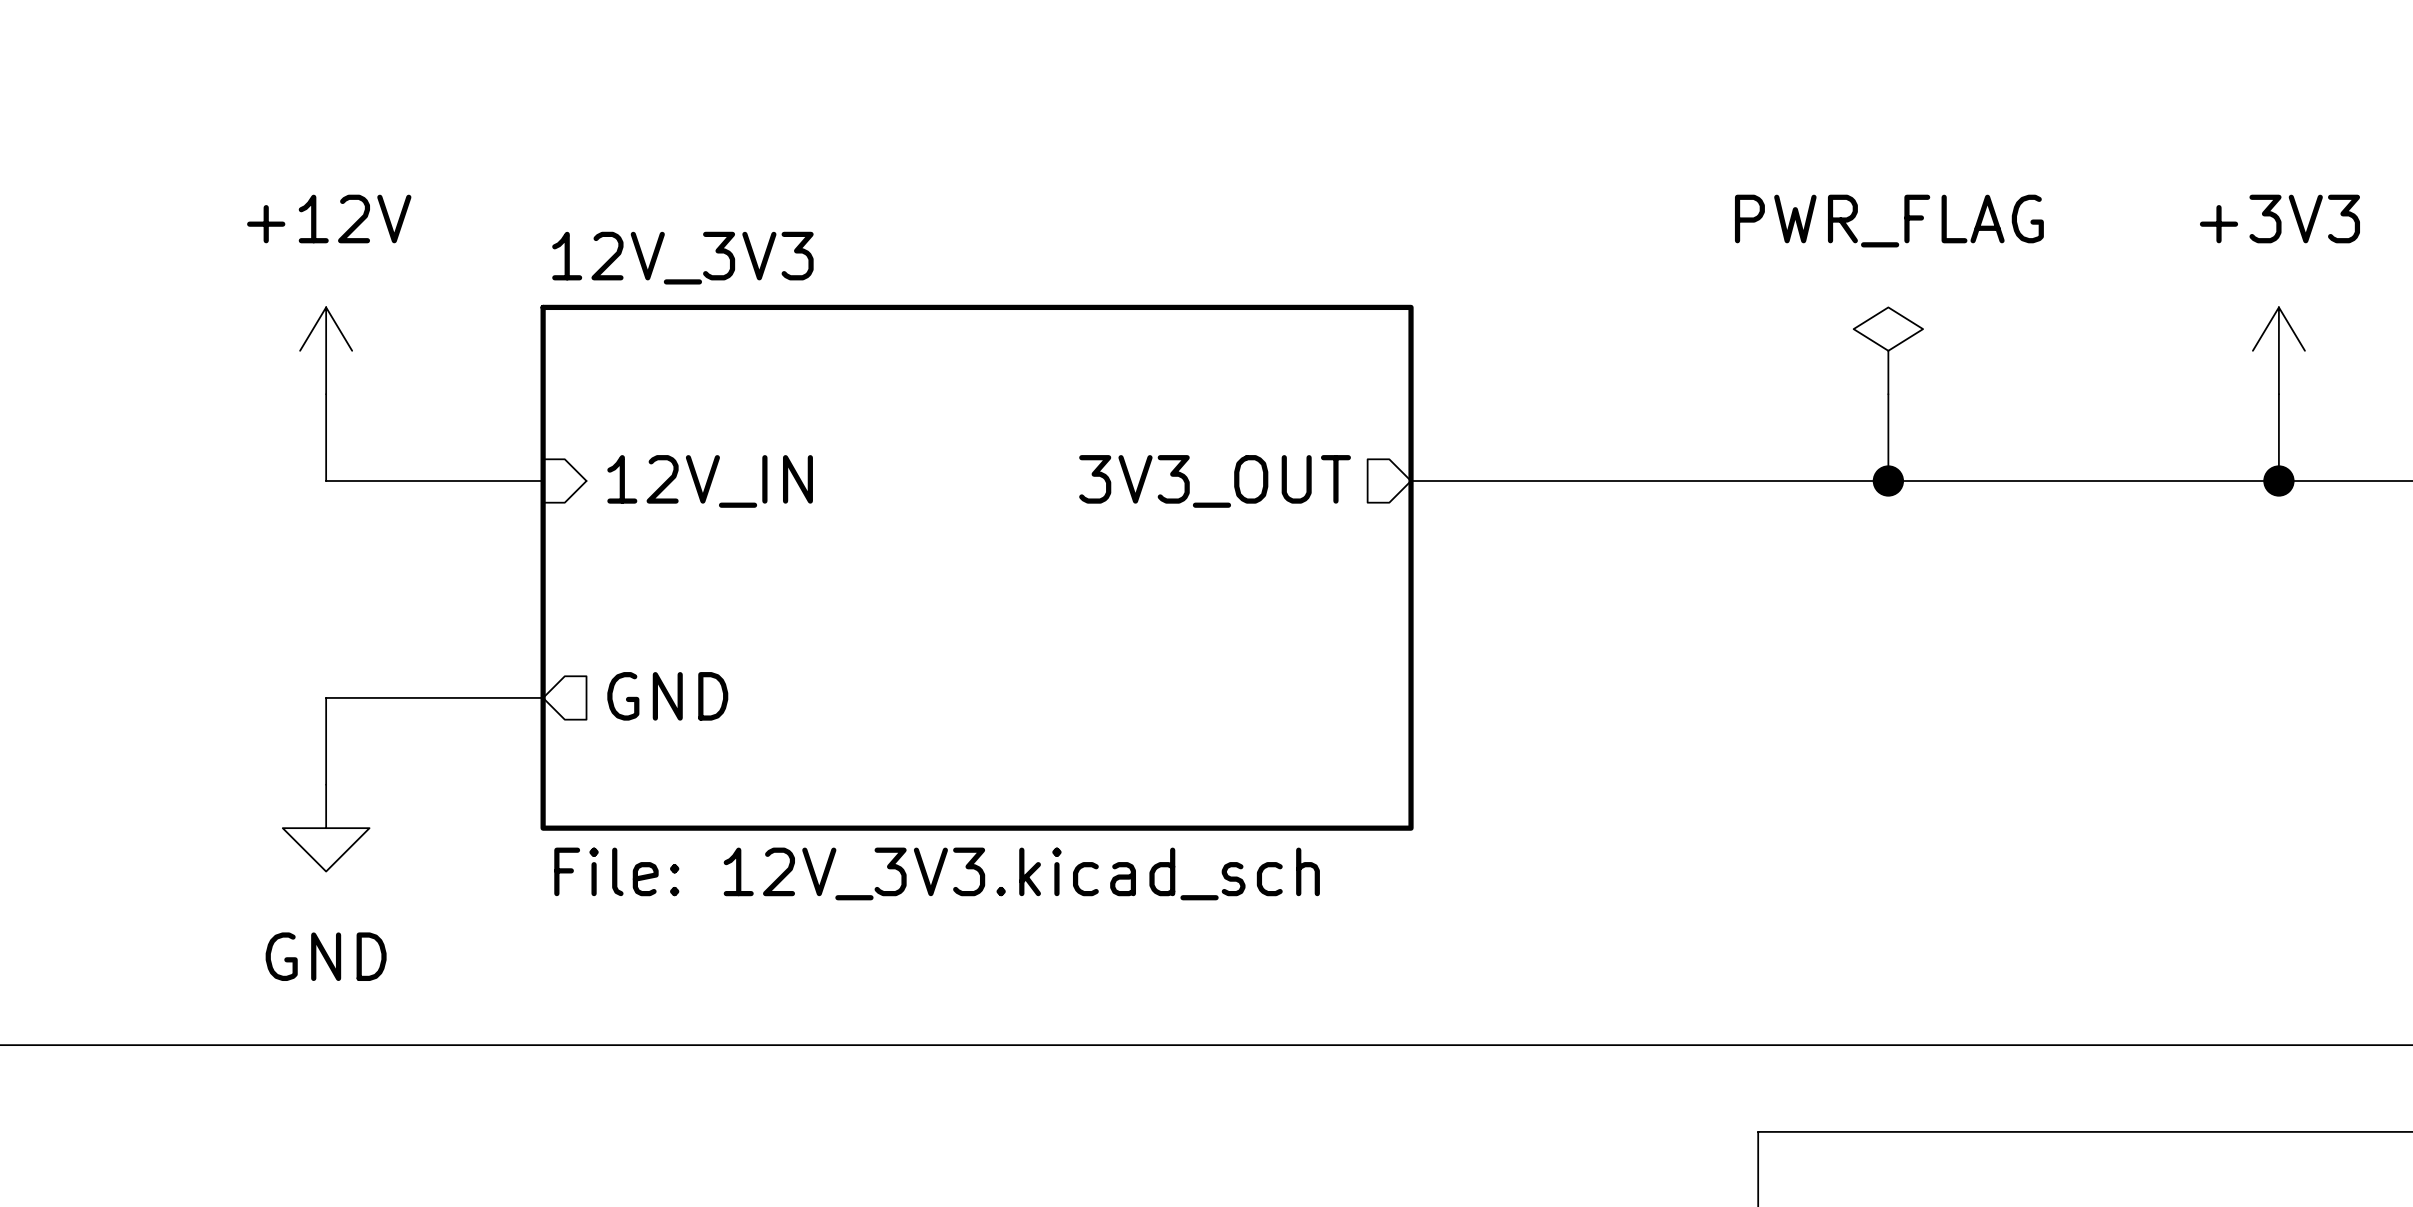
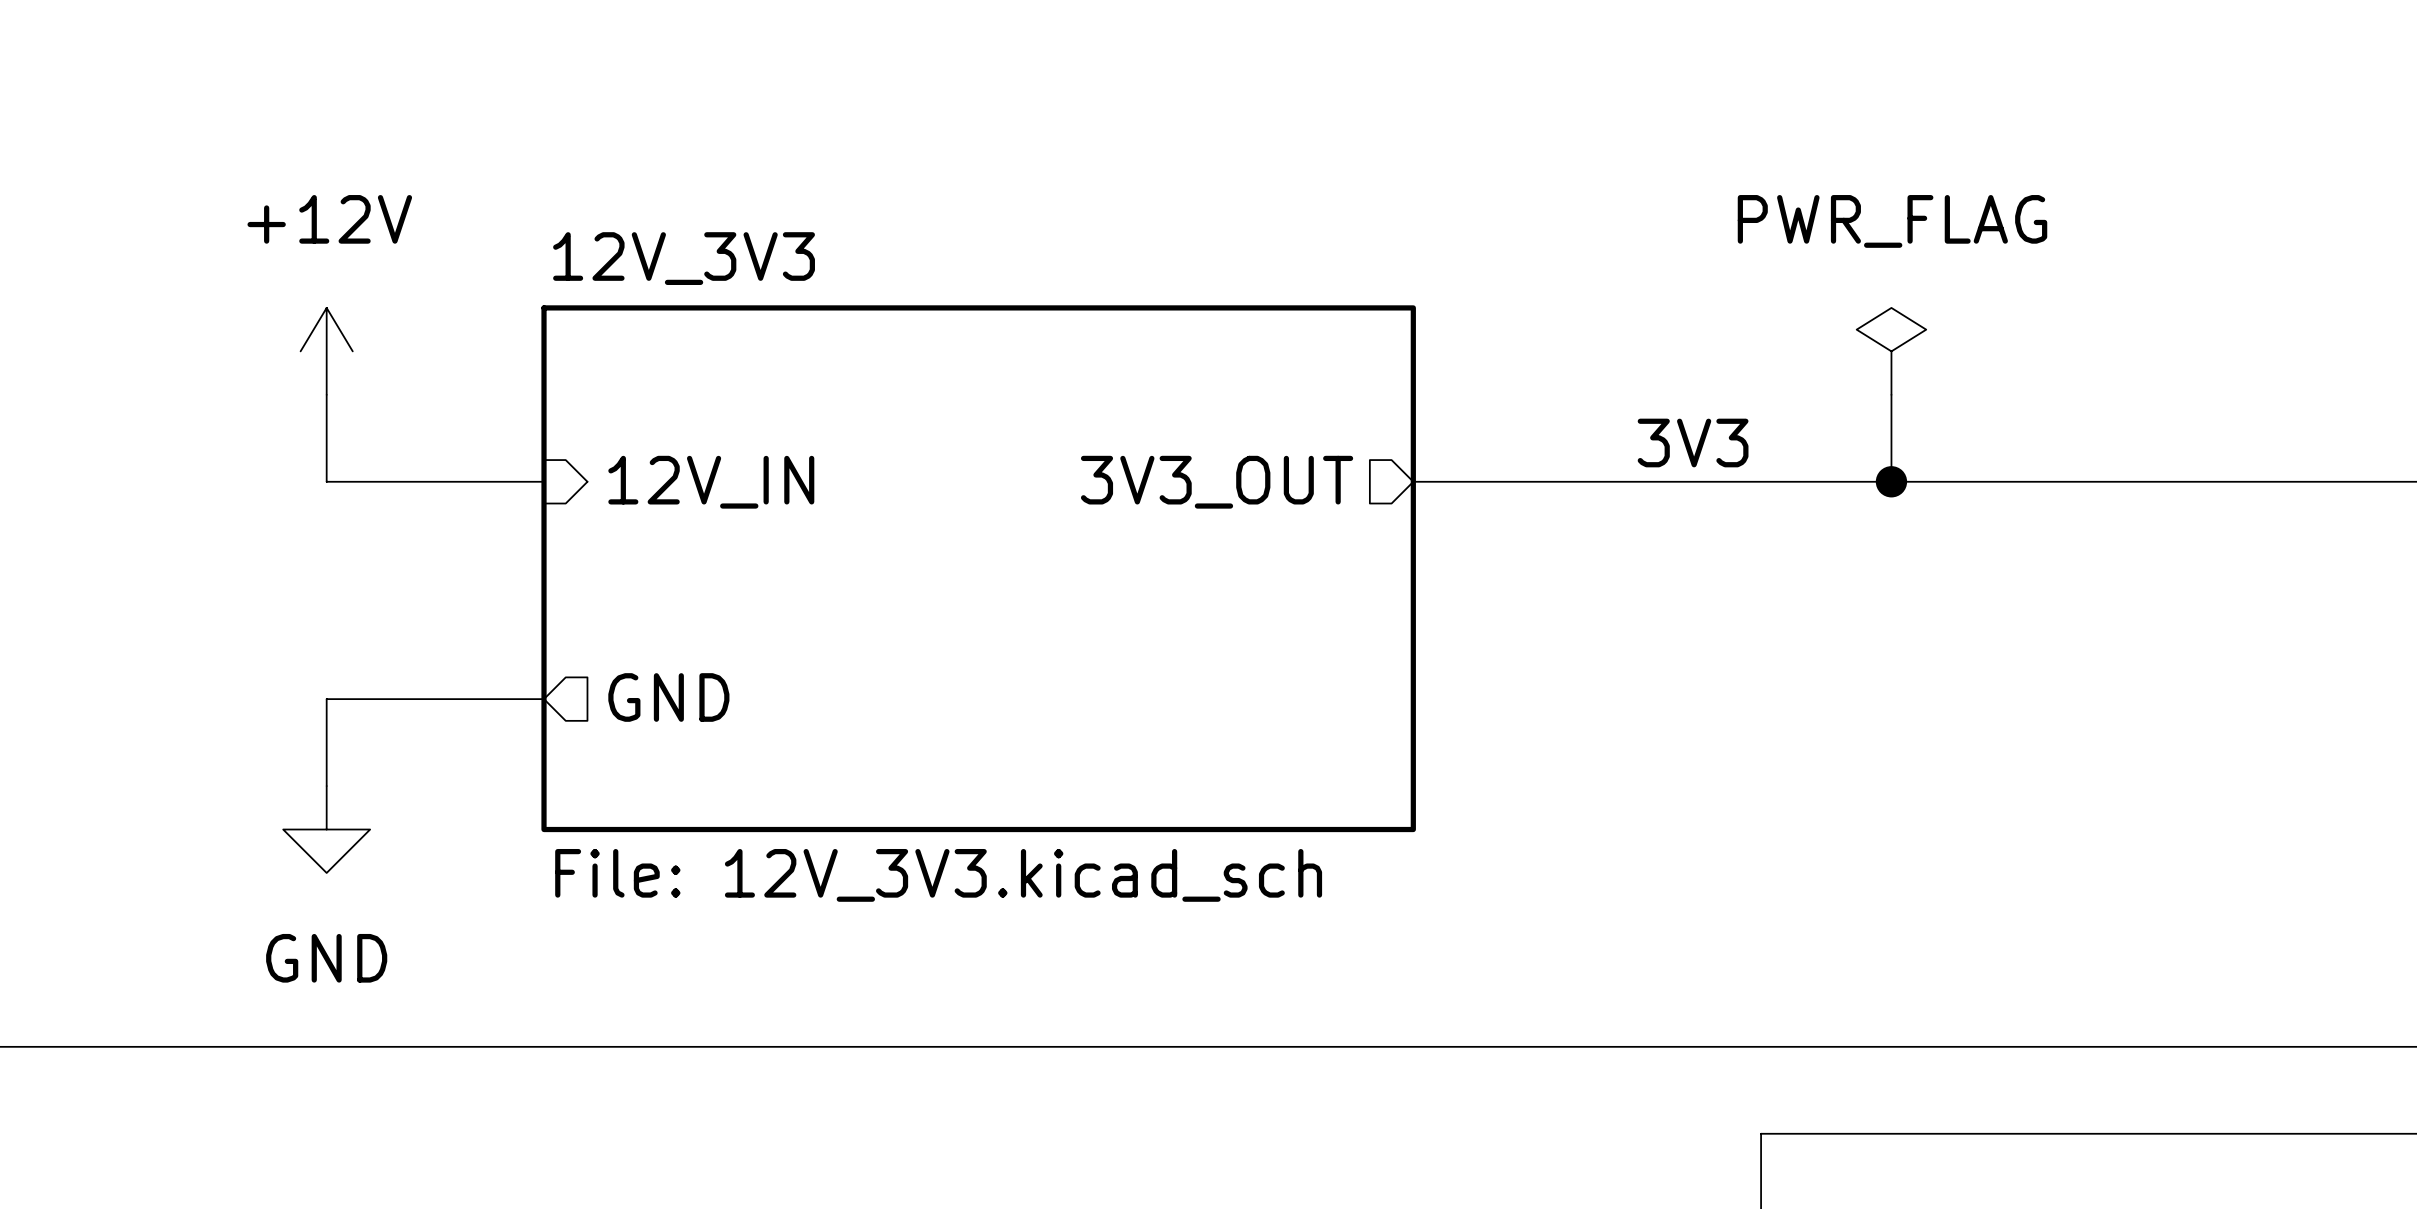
power symbol: +3V3 (2278, 350) -> none
wire: (2278, 394) (2278, 480) -> none
label: none -> 3V3 (1693, 442)
junction: (2278, 480) -> none

